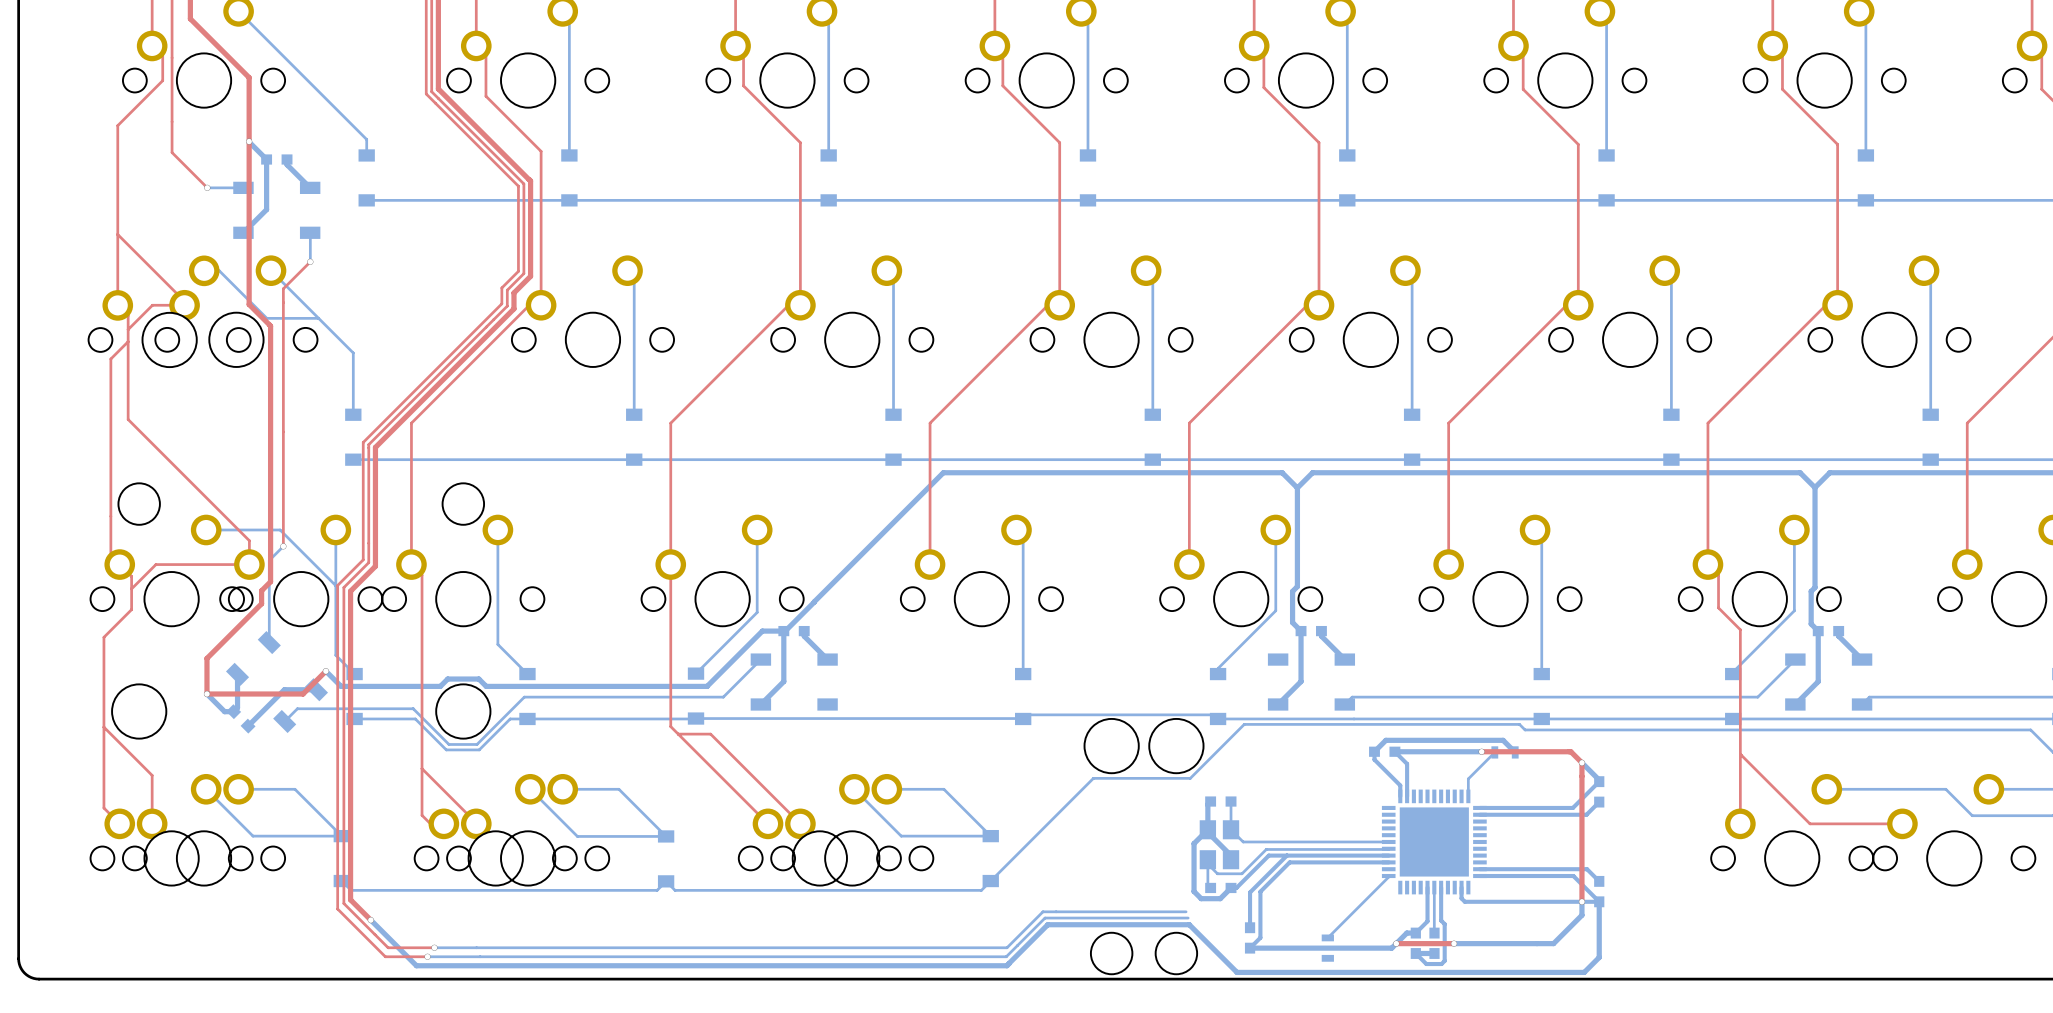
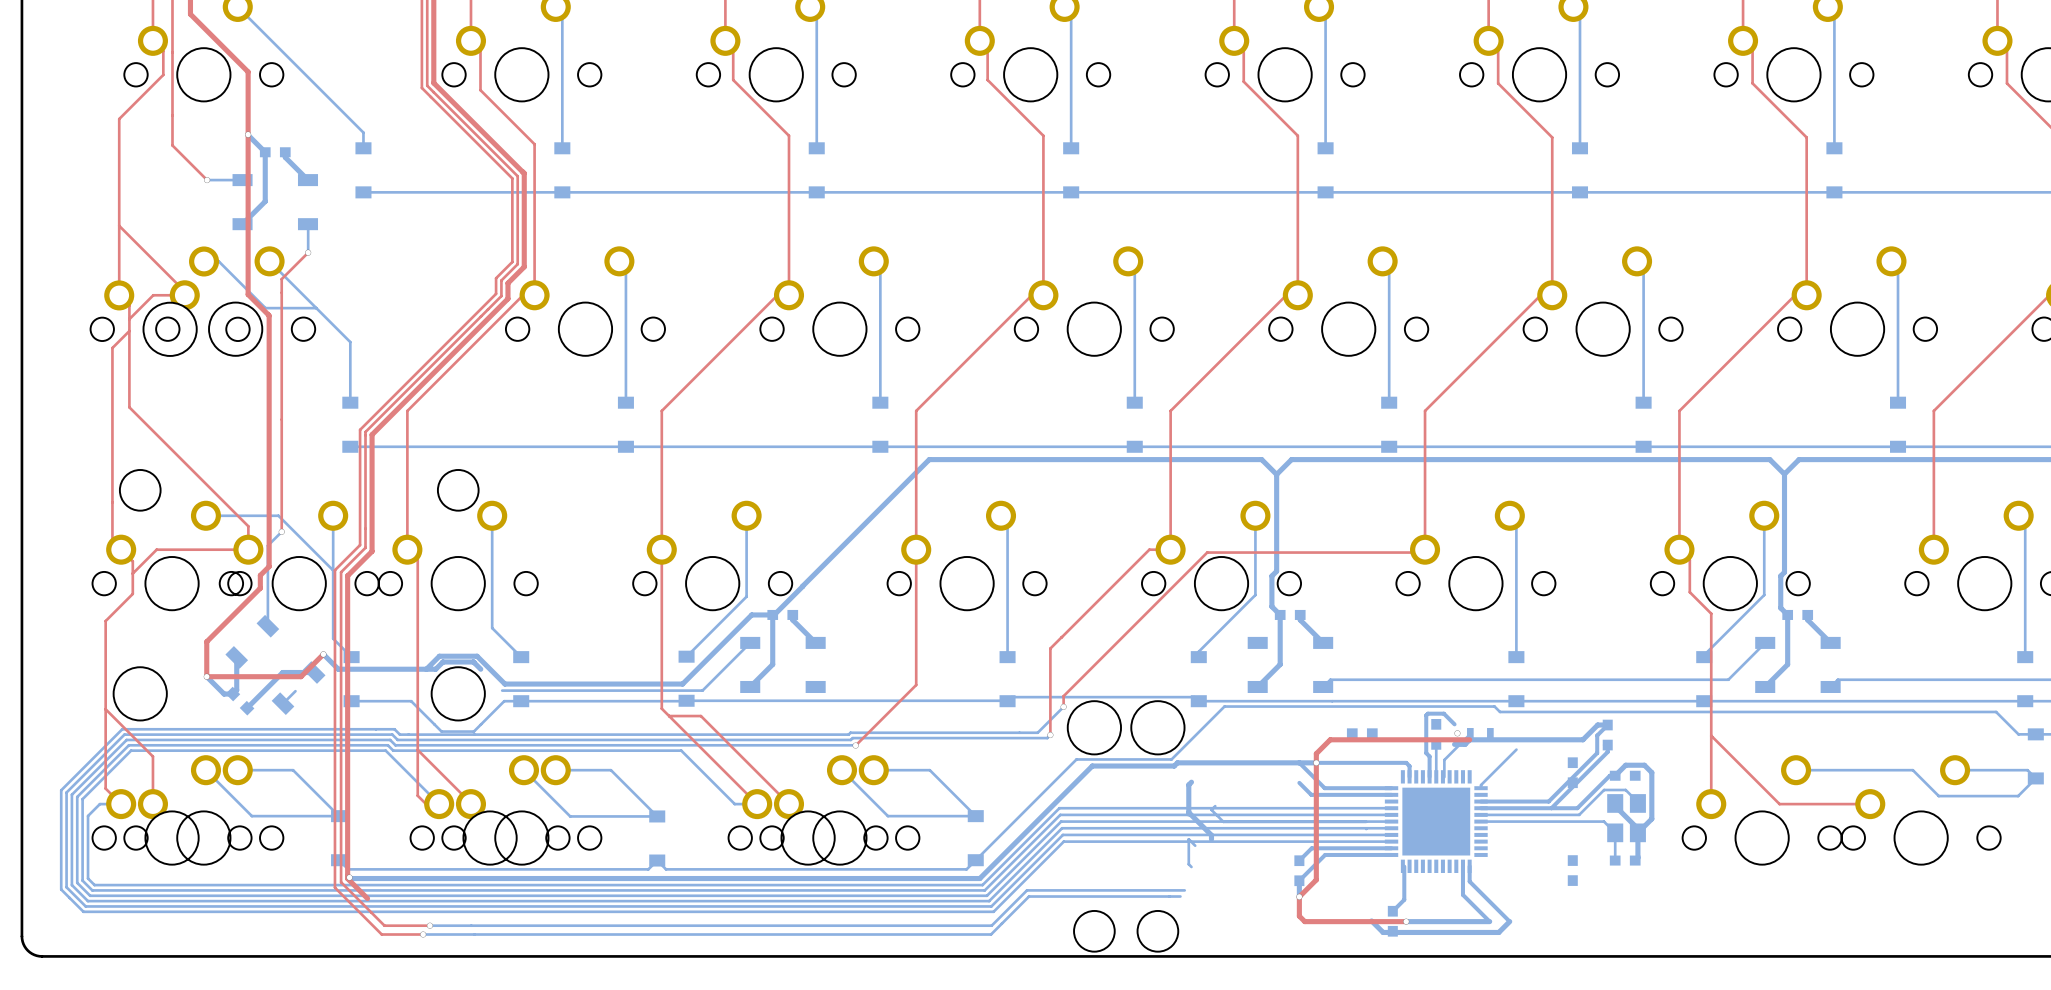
top track: none -> (916, 549) (916, 685) (855, 745)
top track: none -> (1170, 549) (1149, 549) (1061, 637)
top track: none -> (1425, 549) (1422, 552) (1207, 552) (1063, 696) (1063, 706)
top track: none -> (1061, 637) (1050, 648) (1050, 735)
bottom track: (486, 686) (707, 686) -> (426, 669) (439, 656) (477, 656) (504, 684) (682, 684) (697, 669)
bottom track: (723, 697) (524, 697) (476, 744) (448, 744) (413, 708) (297, 708) -> (713, 679) (702, 690) (502, 690)
bottom track: none -> (1063, 706) (1037, 732) (399, 734) (394, 729) (122, 729) (61, 790) (61, 889) (83, 911) (993, 911) (1063, 841) (1391, 841)
via: none -> (1063, 706)
bottom track: none -> (1454, 724) (1443, 713) (1427, 713) (1426, 715) (1426, 753) (1429, 756) (1429, 776)
bottom track: (1481, 751) (1394, 751) (1407, 763) (1407, 796) -> none
top track: (1481, 751) (1570, 751) (1581, 762) (1581, 901) -> none
part: none -> (1436, 734)
bottom track: (1515, 752) (1503, 740) (1385, 740) (1374, 751) (1374, 759) (1400, 785) (1400, 796) -> none
bottom track: none -> (1050, 735) (1047, 738) (852, 738) (850, 739) (397, 739) (392, 734) (124, 734) (66, 792) (66, 887) (85, 906) (991, 906) (1062, 834) (1391, 834)
via: none -> (1050, 735)
part: none -> (1607, 735)
top track: none -> (1469, 739) (1330, 739) (1316, 753) (1316, 879) (1299, 896) (1299, 916) (1304, 921) (1373, 921)
bottom track: none -> (1454, 744) (1465, 744) (1469, 739) (1582, 739) (1597, 725) (1607, 725) (1597, 735) (1597, 753) (1548, 801) (1481, 801)
bottom track: (1581, 762) (1599, 781) (1572, 807) (1479, 807) -> none
via: (1581, 762) -> none
bottom track: none -> (1604, 745) (1607, 745) (1607, 752) (1551, 808)
bottom track: none -> (855, 745) (395, 745) (390, 739) (126, 739) (71, 794) (71, 885) (87, 901) (989, 901) (1062, 828) (1391, 828)
via: none -> (855, 745)
bottom track: none -> (1434, 746) (1436, 744) (1436, 776)
bottom track: none -> (1516, 749) (1481, 785) (1481, 788)
bottom track: none -> (1299, 762) (1324, 788) (1391, 788)
via: none -> (1316, 762)
part: none -> (1625, 775)
bottom track: none -> (1409, 776) (1409, 766) (1406, 762) (1177, 762) (1174, 766) (1092, 766) (979, 878) (349, 877)
part: (1220, 801) -> none
bottom track: (1231, 801) (1231, 829) -> none
bottom track: none -> (1299, 782) (1311, 794) (1391, 794)
bottom track: (1599, 802) (1586, 814) (1479, 814) -> none
bottom track: none -> (1637, 802) (1625, 789) (1604, 789) (1579, 814) (1481, 814)
bottom track: none -> (121, 804) (99, 804) (88, 816) (88, 878) (94, 885) (982, 885) (1059, 808) (1391, 808)
bottom track: none -> (439, 804) (385, 750) (131, 750) (82, 799) (82, 880) (92, 890) (984, 890) (1060, 814) (1391, 814)
bottom track: none -> (757, 804) (734, 804) (681, 750) (393, 750) (387, 745) (128, 745) (77, 796) (77, 882) (90, 895) (986, 895) (1061, 821) (1391, 821)
bottom track: none -> (1615, 806) (1637, 828) (1637, 857) (1635, 860)
bottom track: (1210, 827) (1194, 843) (1194, 891) (1201, 898) (1220, 898) (1231, 887) (1236, 887) (1268, 855) (1388, 855) -> none
bottom track: none -> (1481, 808) (1577, 808) (1609, 775) (1615, 775) (1625, 765) (1644, 765) (1651, 772) (1651, 818) (1635, 835)
part: none -> (1626, 818)
part position: (1434, 841) -> (1436, 821)
bottom track: none -> (1481, 821) (1603, 821) (1615, 832)
part: (1219, 844) -> none
bottom track: (1388, 849) (1266, 849) (1241, 873) (1217, 873) (1207, 864) -> none
bottom track: none -> (1615, 832) (1615, 860)
bottom track: (1286, 855) (1250, 892) (1250, 927) -> none
bottom track: (1388, 862) (1289, 862) (1260, 891) (1260, 937) (1250, 948) (1391, 948) (1406, 933) (1415, 933) -> none
bottom track: none -> (1391, 848) (1311, 848) (1299, 860)
bottom track: (1479, 869) (1587, 869) (1599, 881) -> none
bottom track: none -> (1391, 854) (1325, 854) (1299, 880) (1299, 896)
bottom track: (1388, 876) (1327, 937) -> none
bottom track: (1479, 876) (1573, 876) (1599, 901) -> none
part: none -> (1625, 860)
part: (1220, 887) -> none
bottom track: (1434, 887) (1434, 932) -> none
bottom track: (1441, 887) (1441, 920) (1444, 924) (1444, 960) (1441, 964) (1426, 964) (1415, 953) (1434, 953) -> none
bottom track: (1461, 887) (1461, 898) (1464, 901) (1581, 901) (1581, 915) (1553, 943) (1514, 943) -> (1462, 866) (1462, 894) (1489, 921)
bottom track: none -> (1469, 866) (1469, 881) (1509, 921) (1498, 932) (1383, 932) (1371, 920)
part: none -> (1299, 870)
bottom track: (1581, 901) (1599, 901) -> none
via: (1581, 901) -> none
bottom track: (1599, 901) (1599, 957) (1584, 972) (1237, 972) (1189, 924) (1047, 924) (1009, 963) -> none
bottom track: none -> (1167, 890) (1184, 890)
bottom track: none -> (1169, 896) (1180, 896)
via: none -> (1299, 896)
bottom track: (370, 920) (416, 965) (1007, 965) (1009, 963) -> none
via position: (370, 920) -> (349, 877)
part: (1250, 937) -> none
via: (1396, 943) -> none
bottom track: none -> (1406, 921) (1430, 921)
top track: (1429, 943) (1454, 943) -> none
via: none -> (1406, 921)
part: (1434, 943) -> none
via: (1454, 943) -> none
part: (1327, 948) -> none

